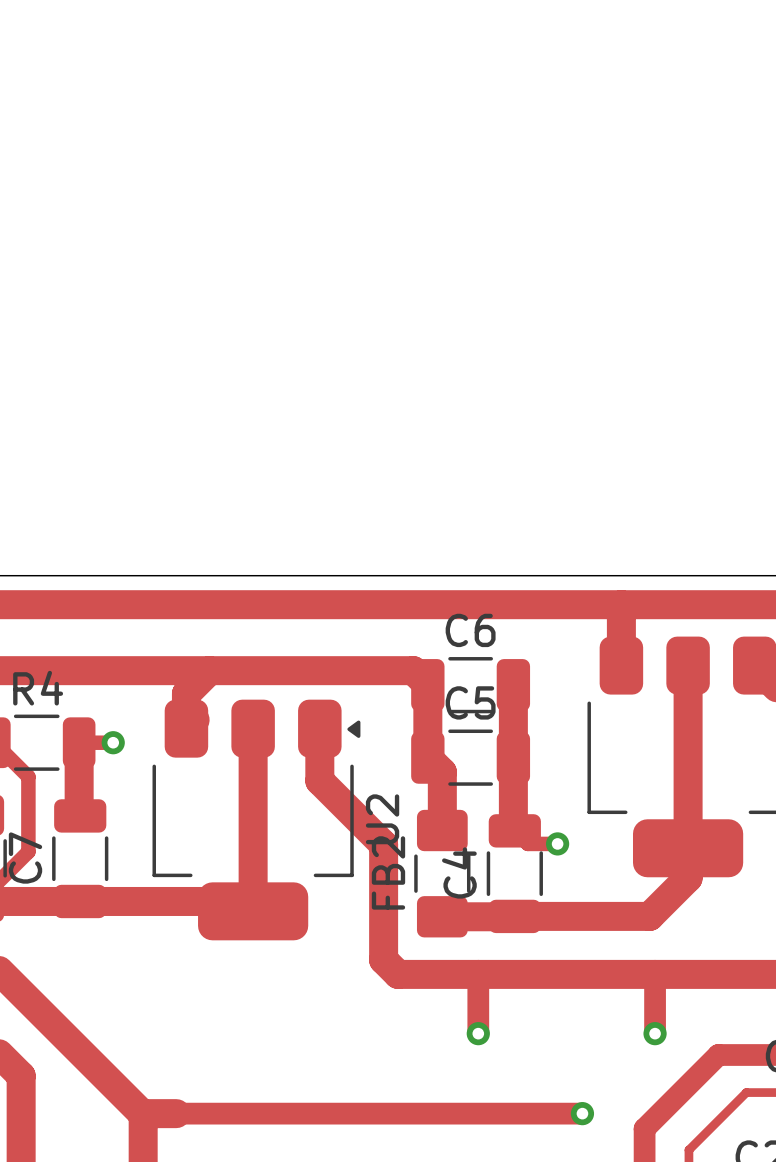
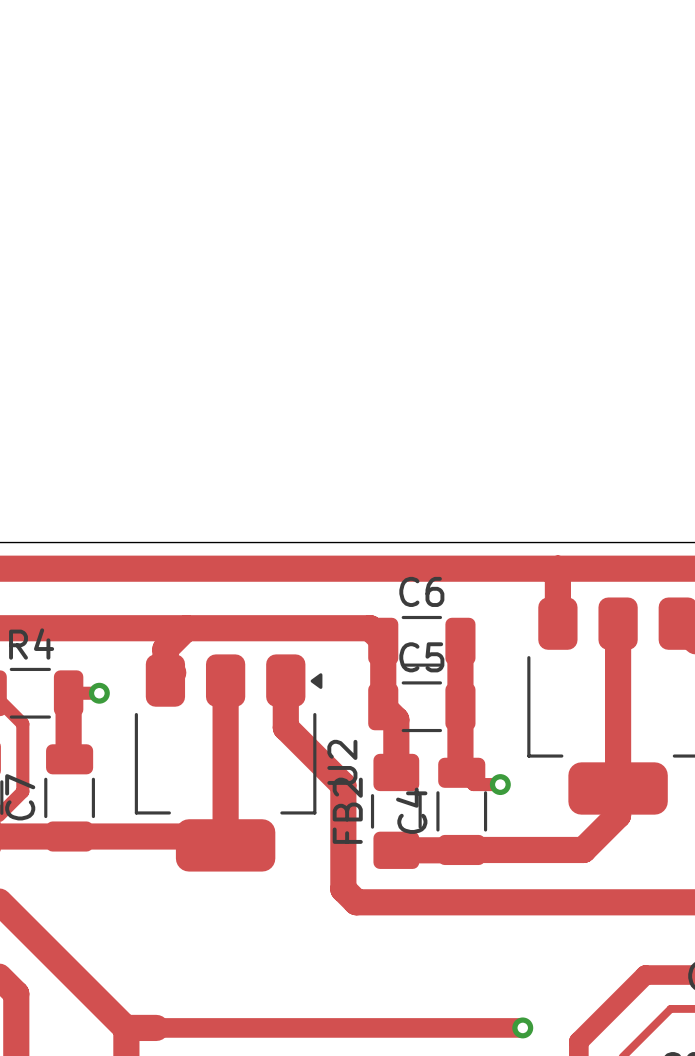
track: (478, 974) (478, 1033) -> none
track: (655, 974) (655, 1033) -> none
via: (478, 1033) -> none
via: (655, 1033) -> none

